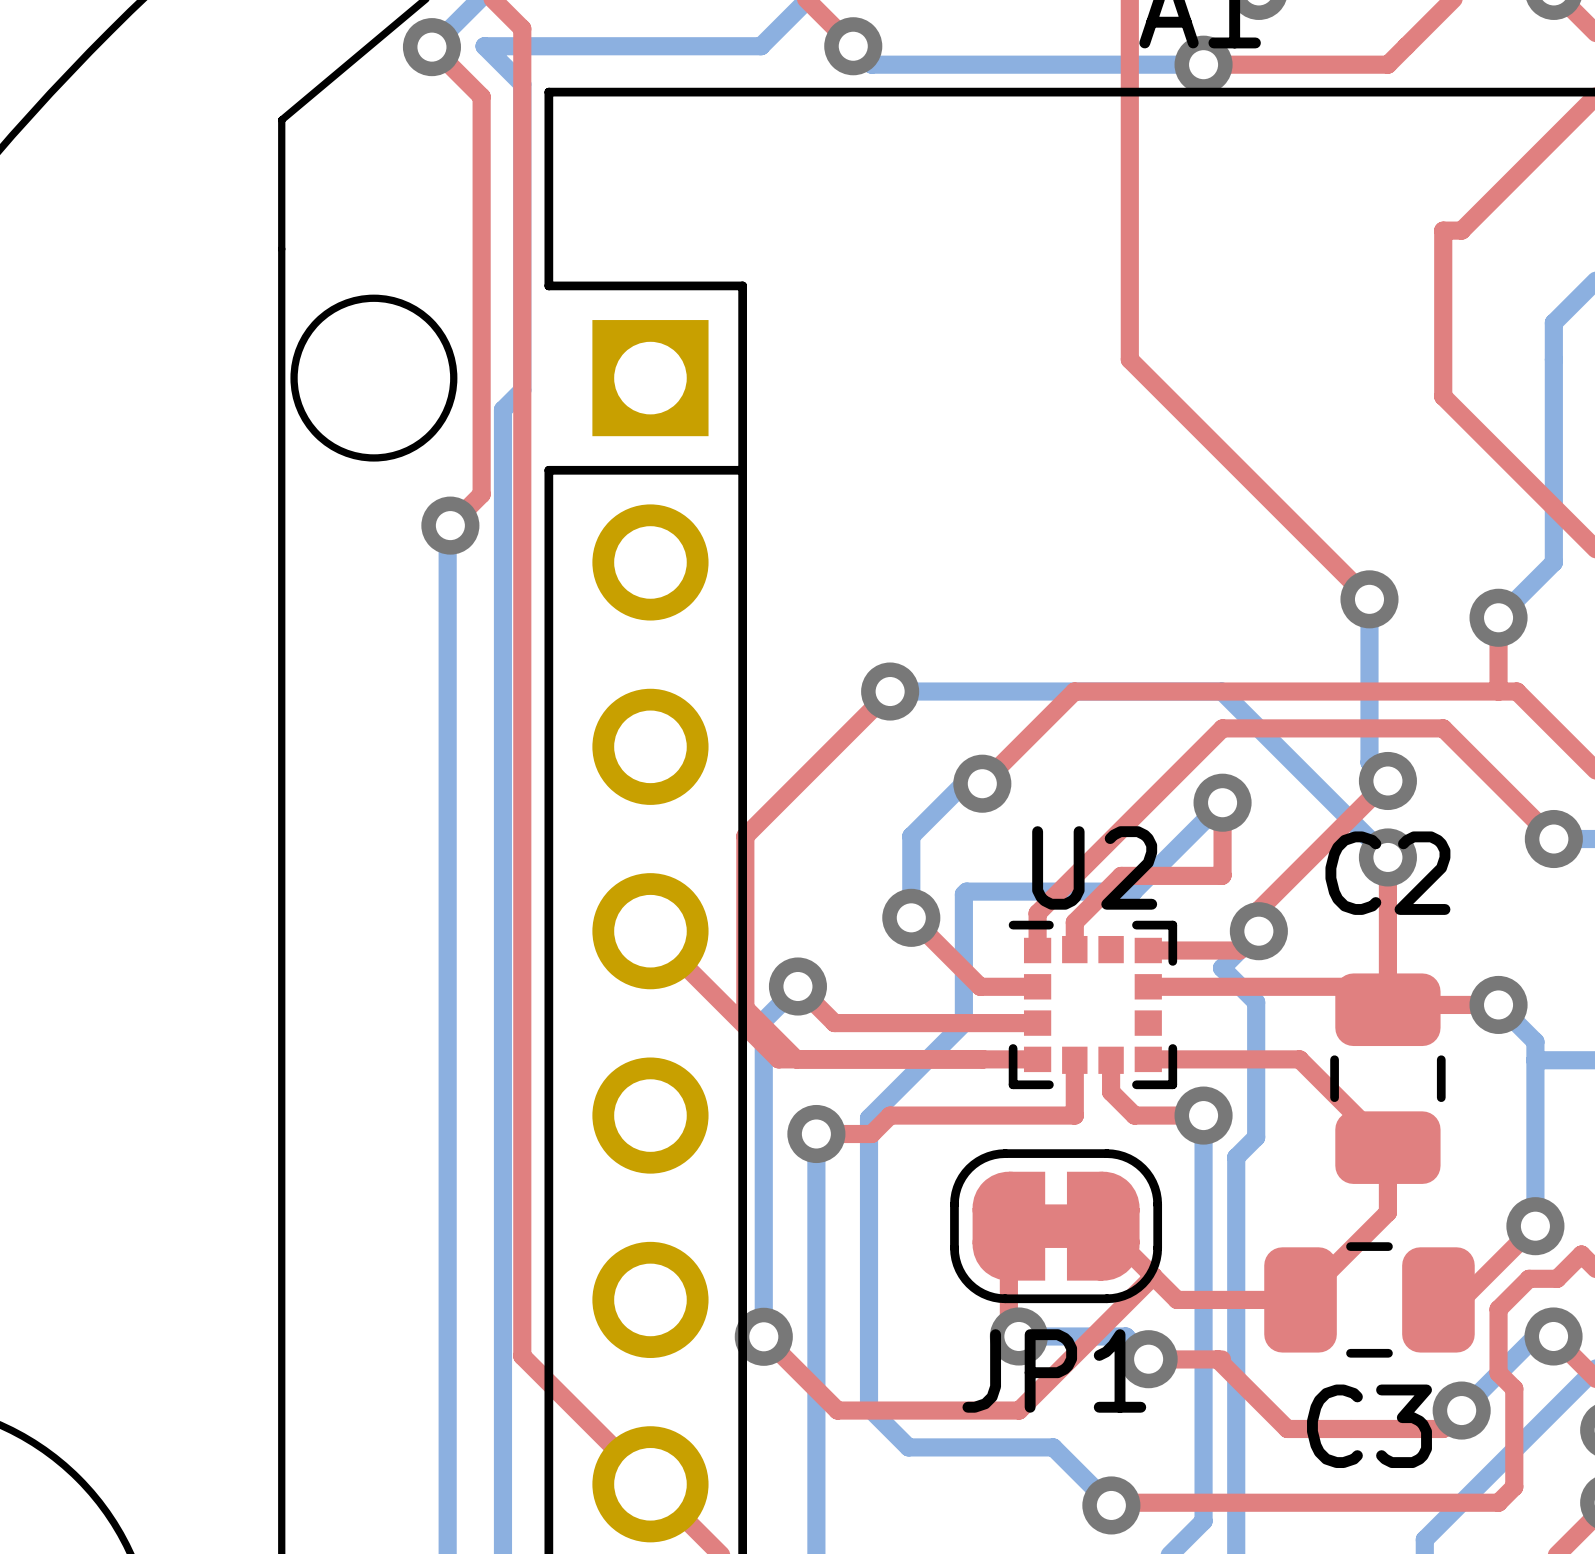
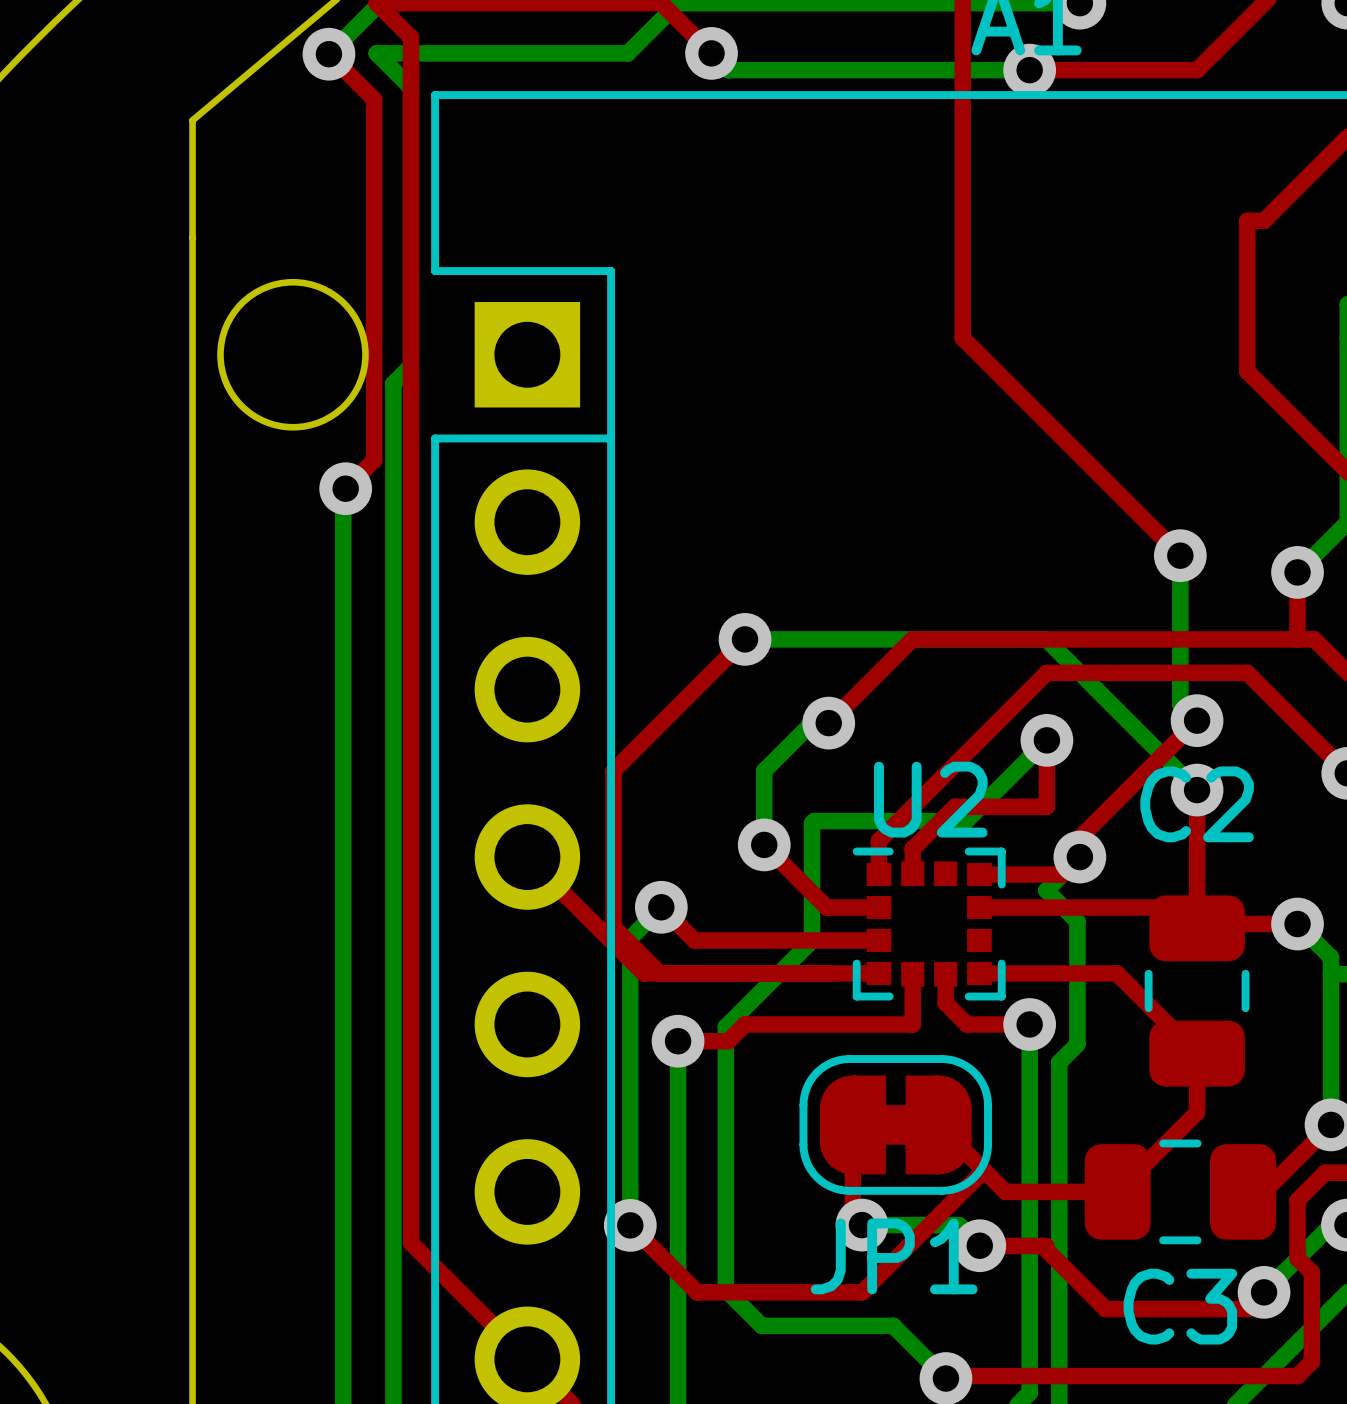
round board edge position: (373, 378) -> (292, 354)

